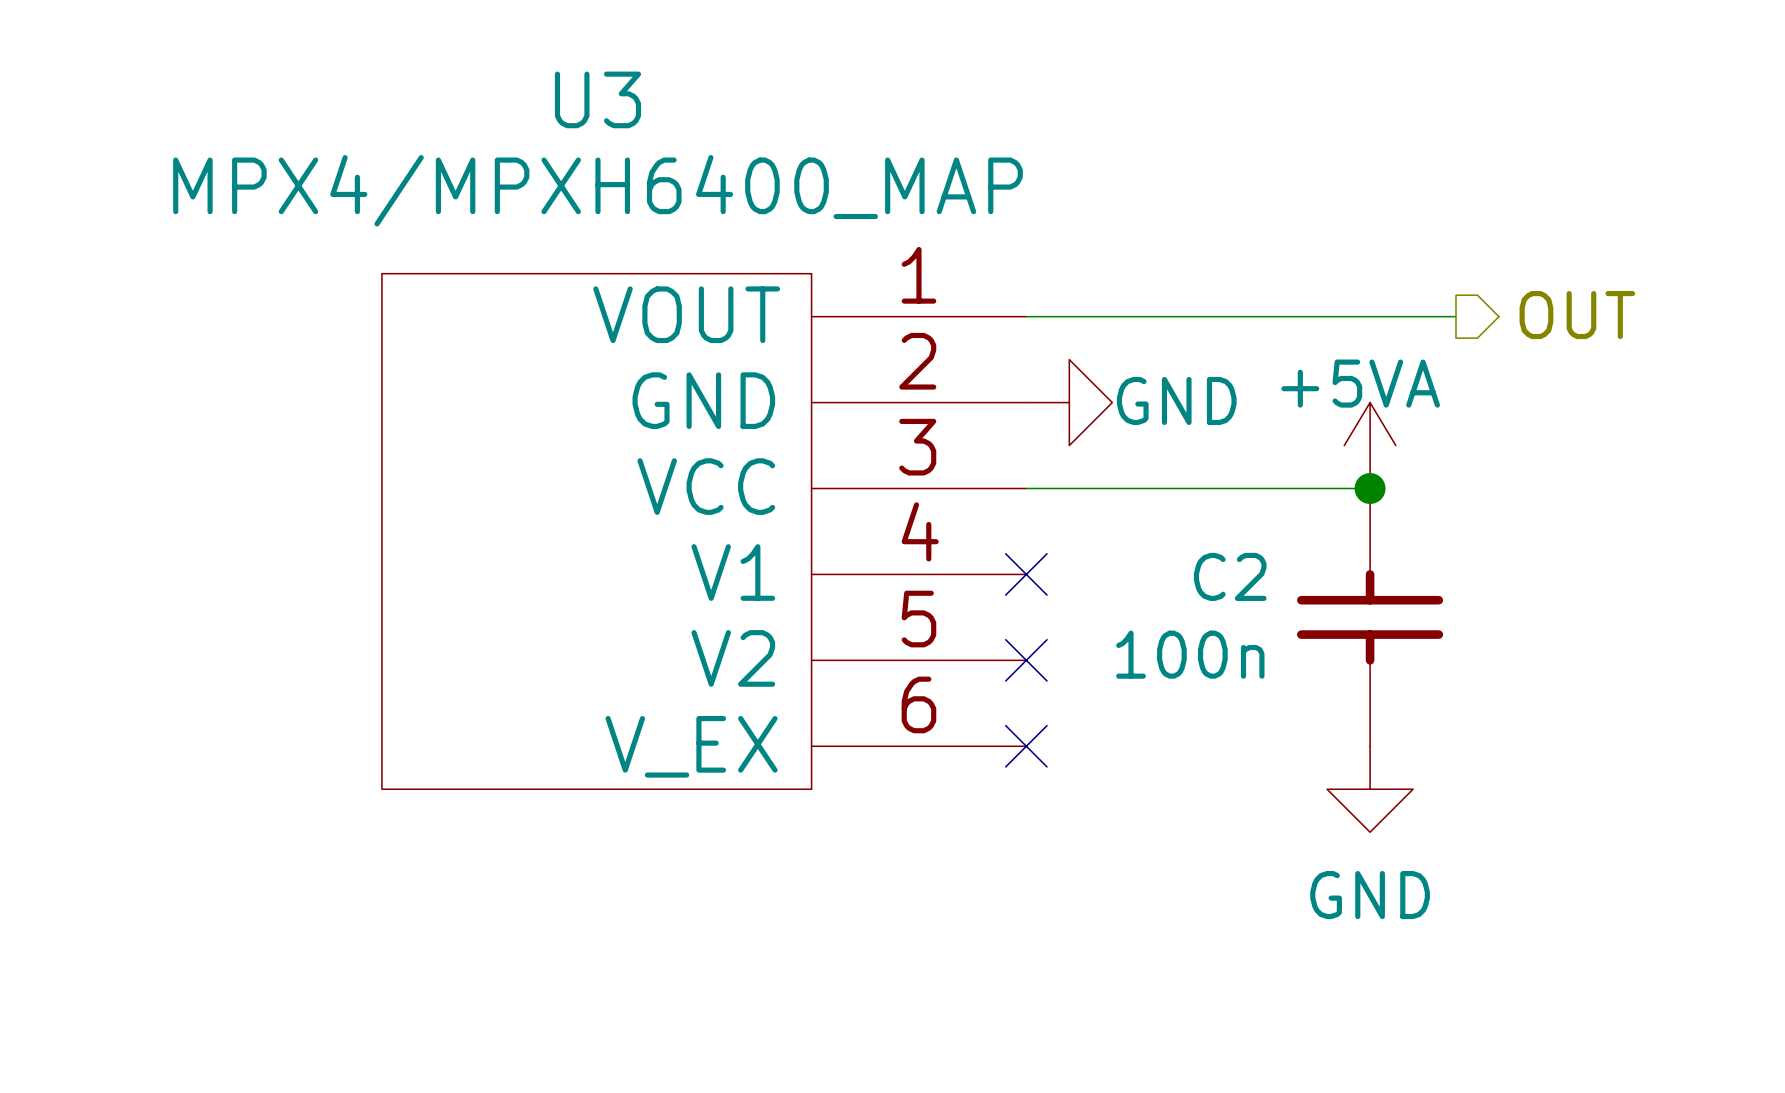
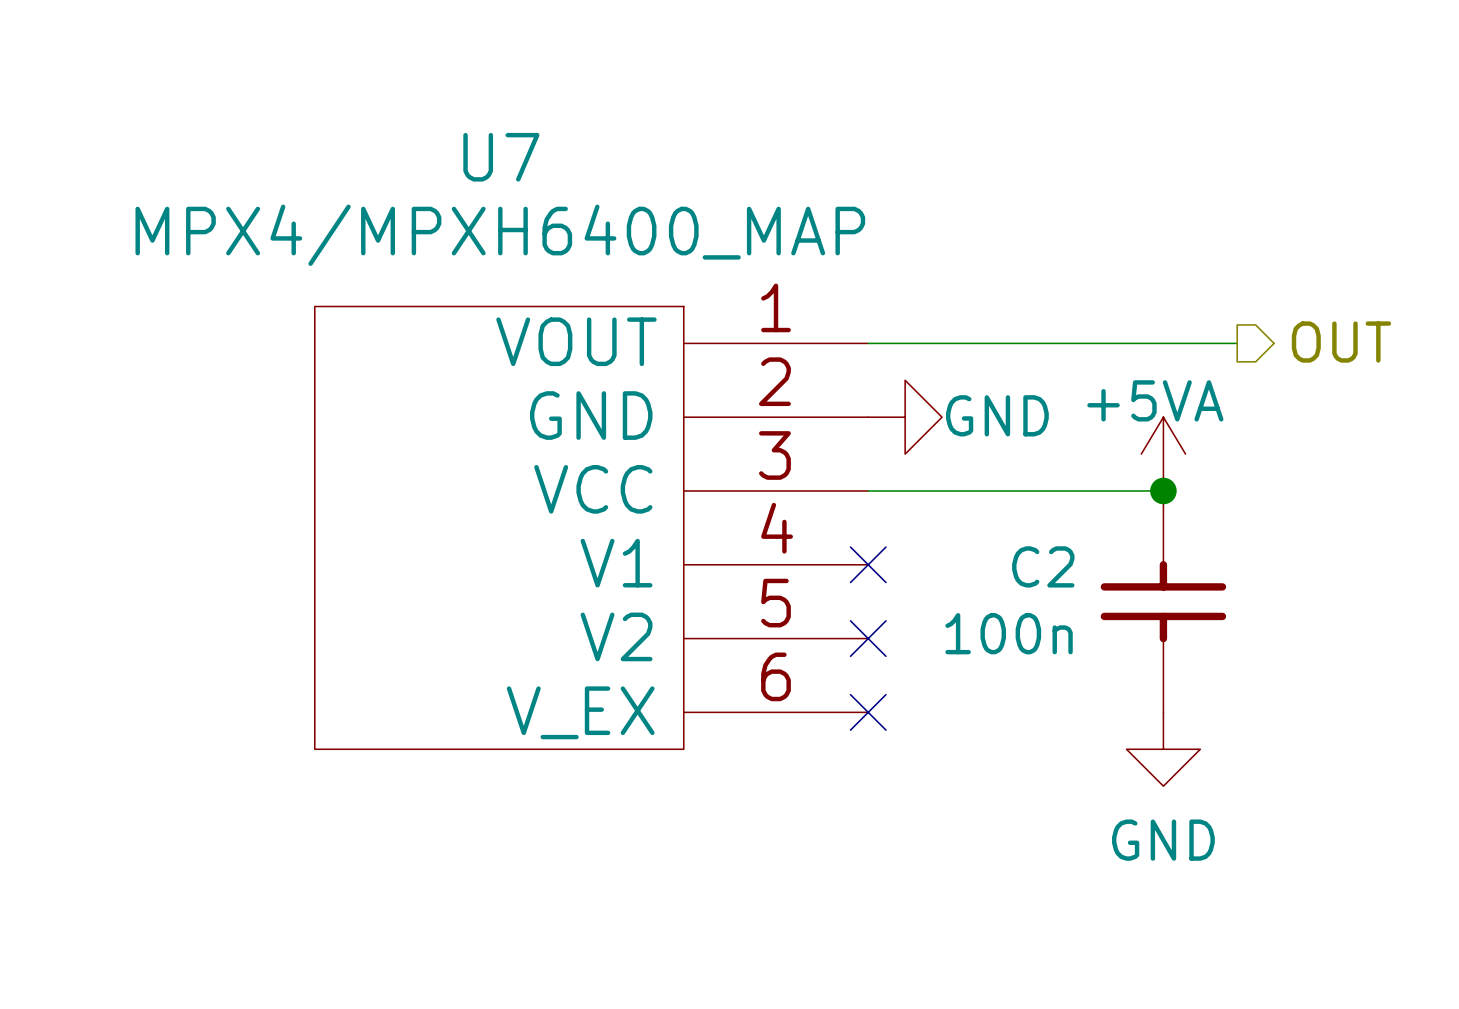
U3 name: U3 (597, 99) -> U7 (501, 157)

